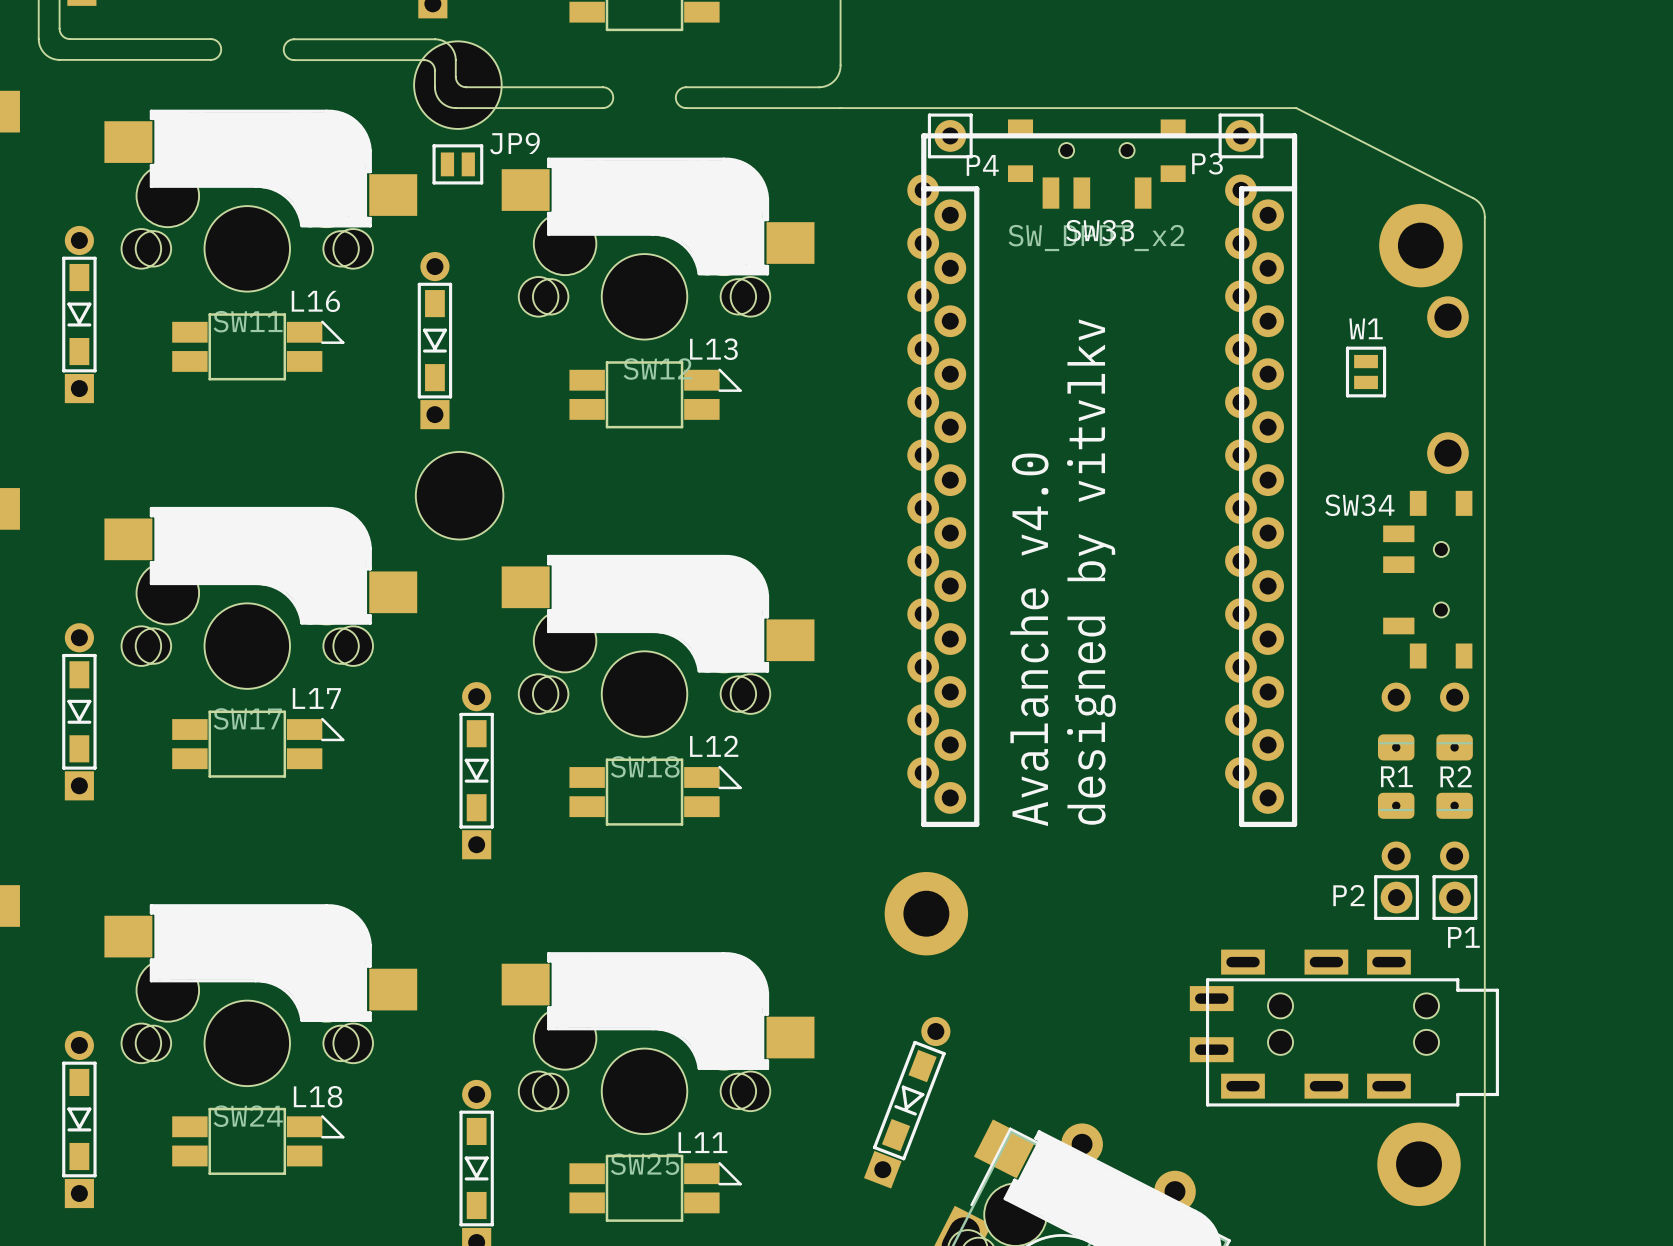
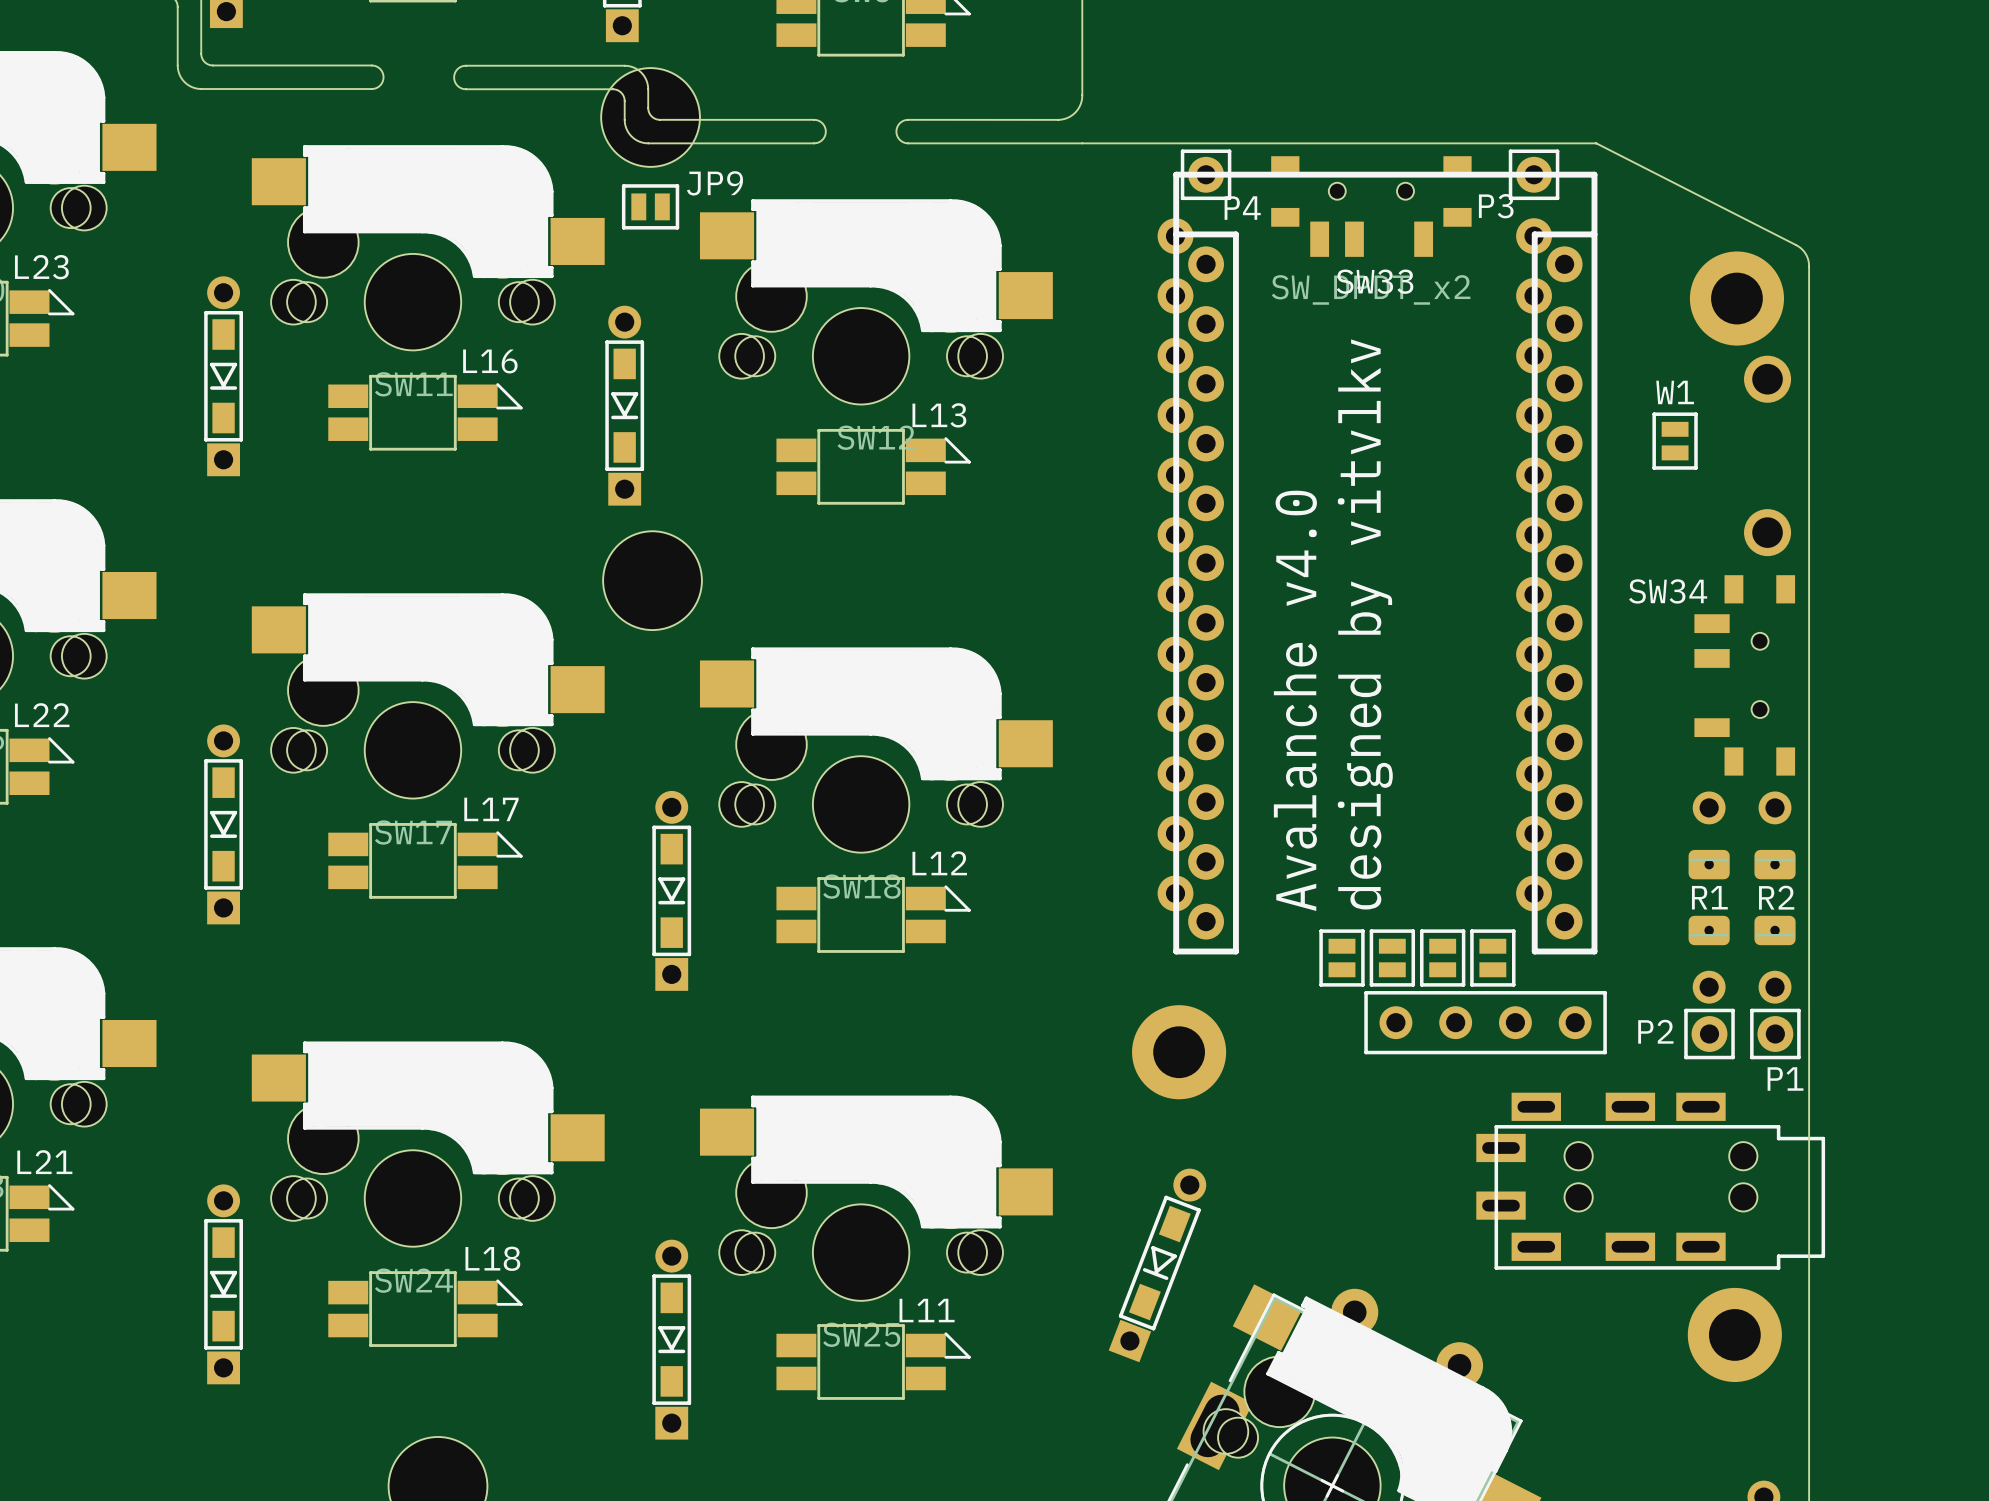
text position: designed by vitvlkv (1091, 572) -> designed by vitvlkv (1365, 624)
text position: Avalanche v4.0 (1029, 639) -> Avalanche v4.0 (1295, 700)
part: none -> (1341, 958)
part: none -> (1392, 958)
part: none -> (1442, 958)
part: none -> (1492, 958)
part: none -> (1485, 1022)

